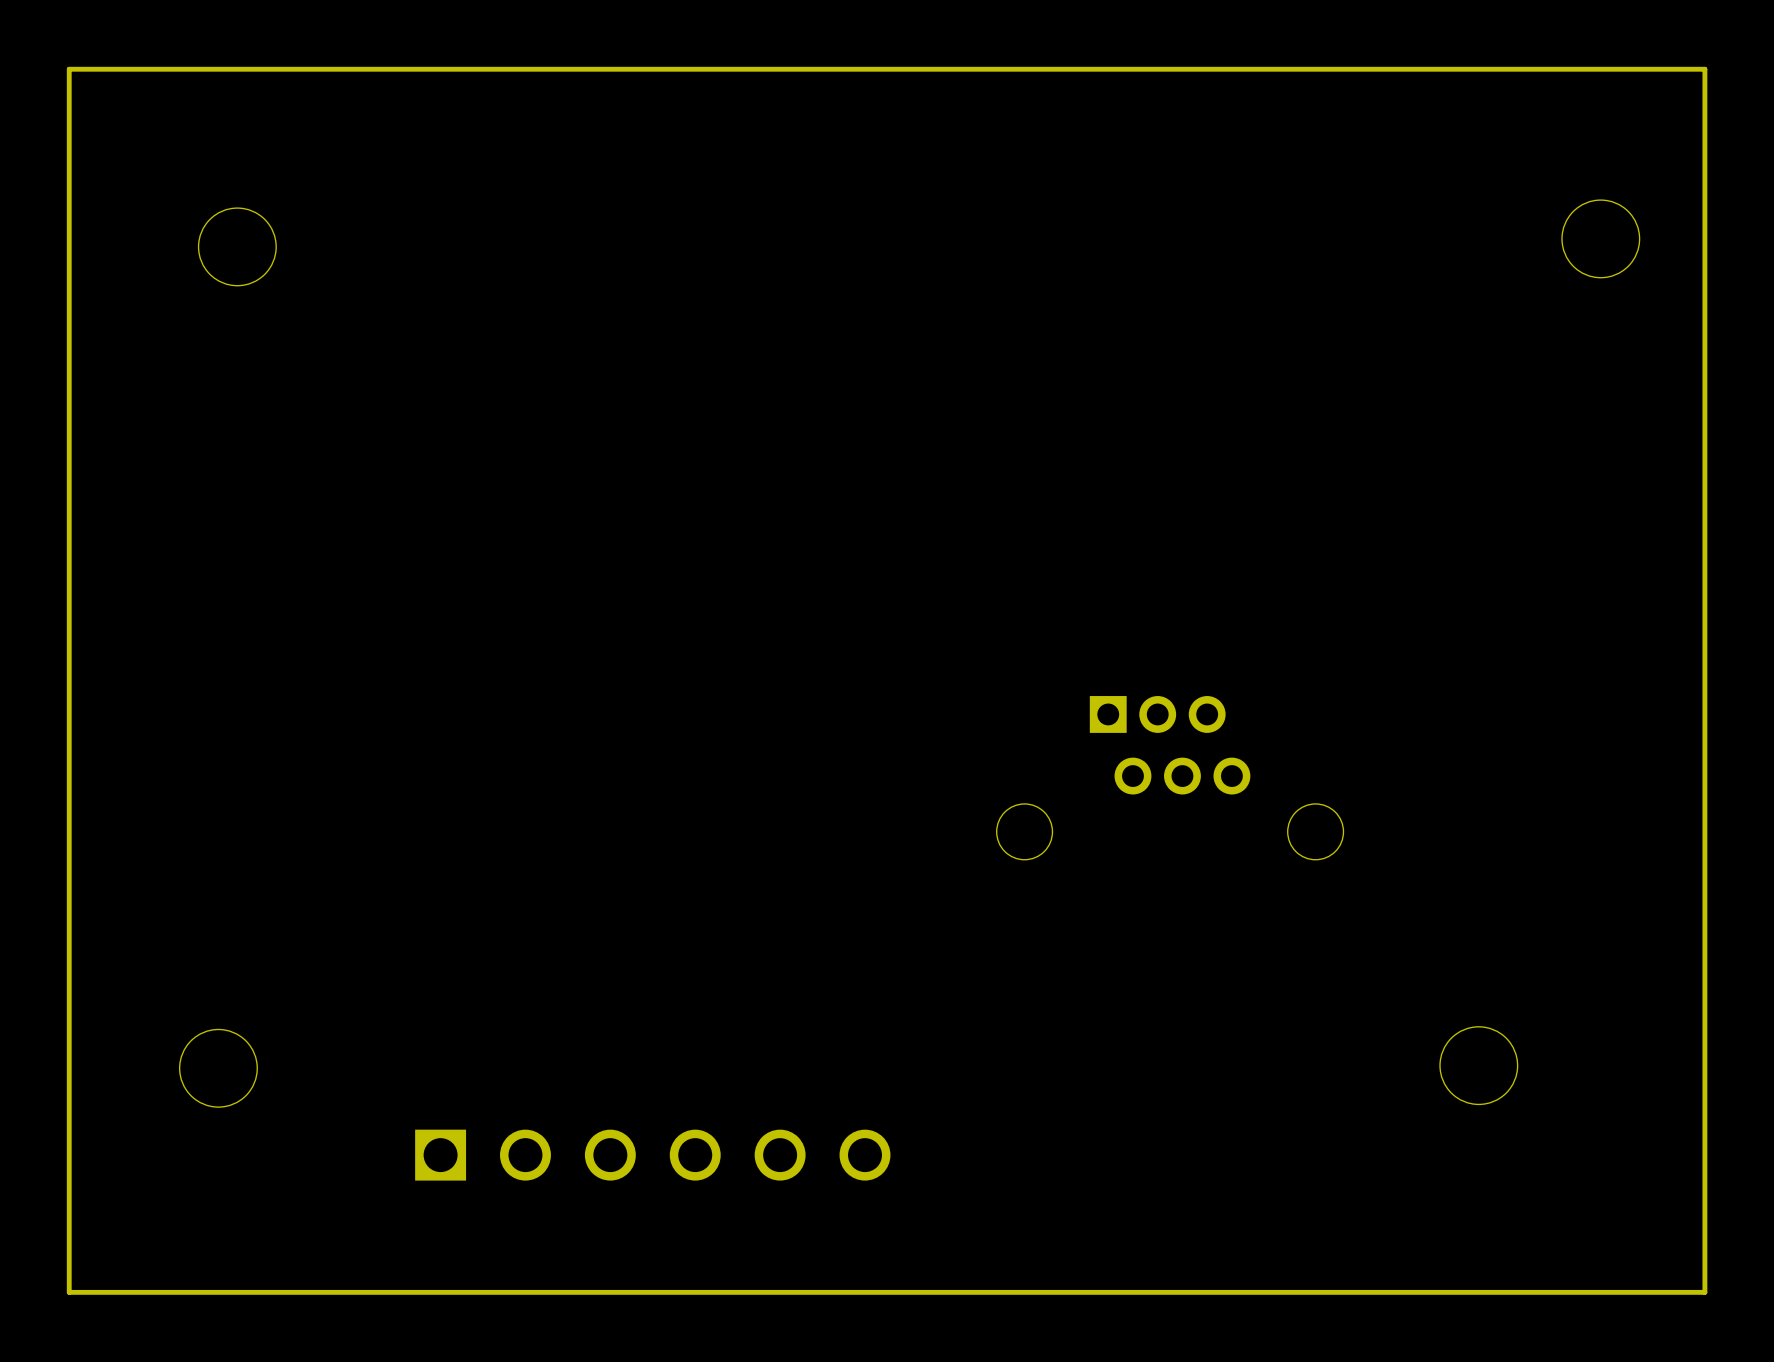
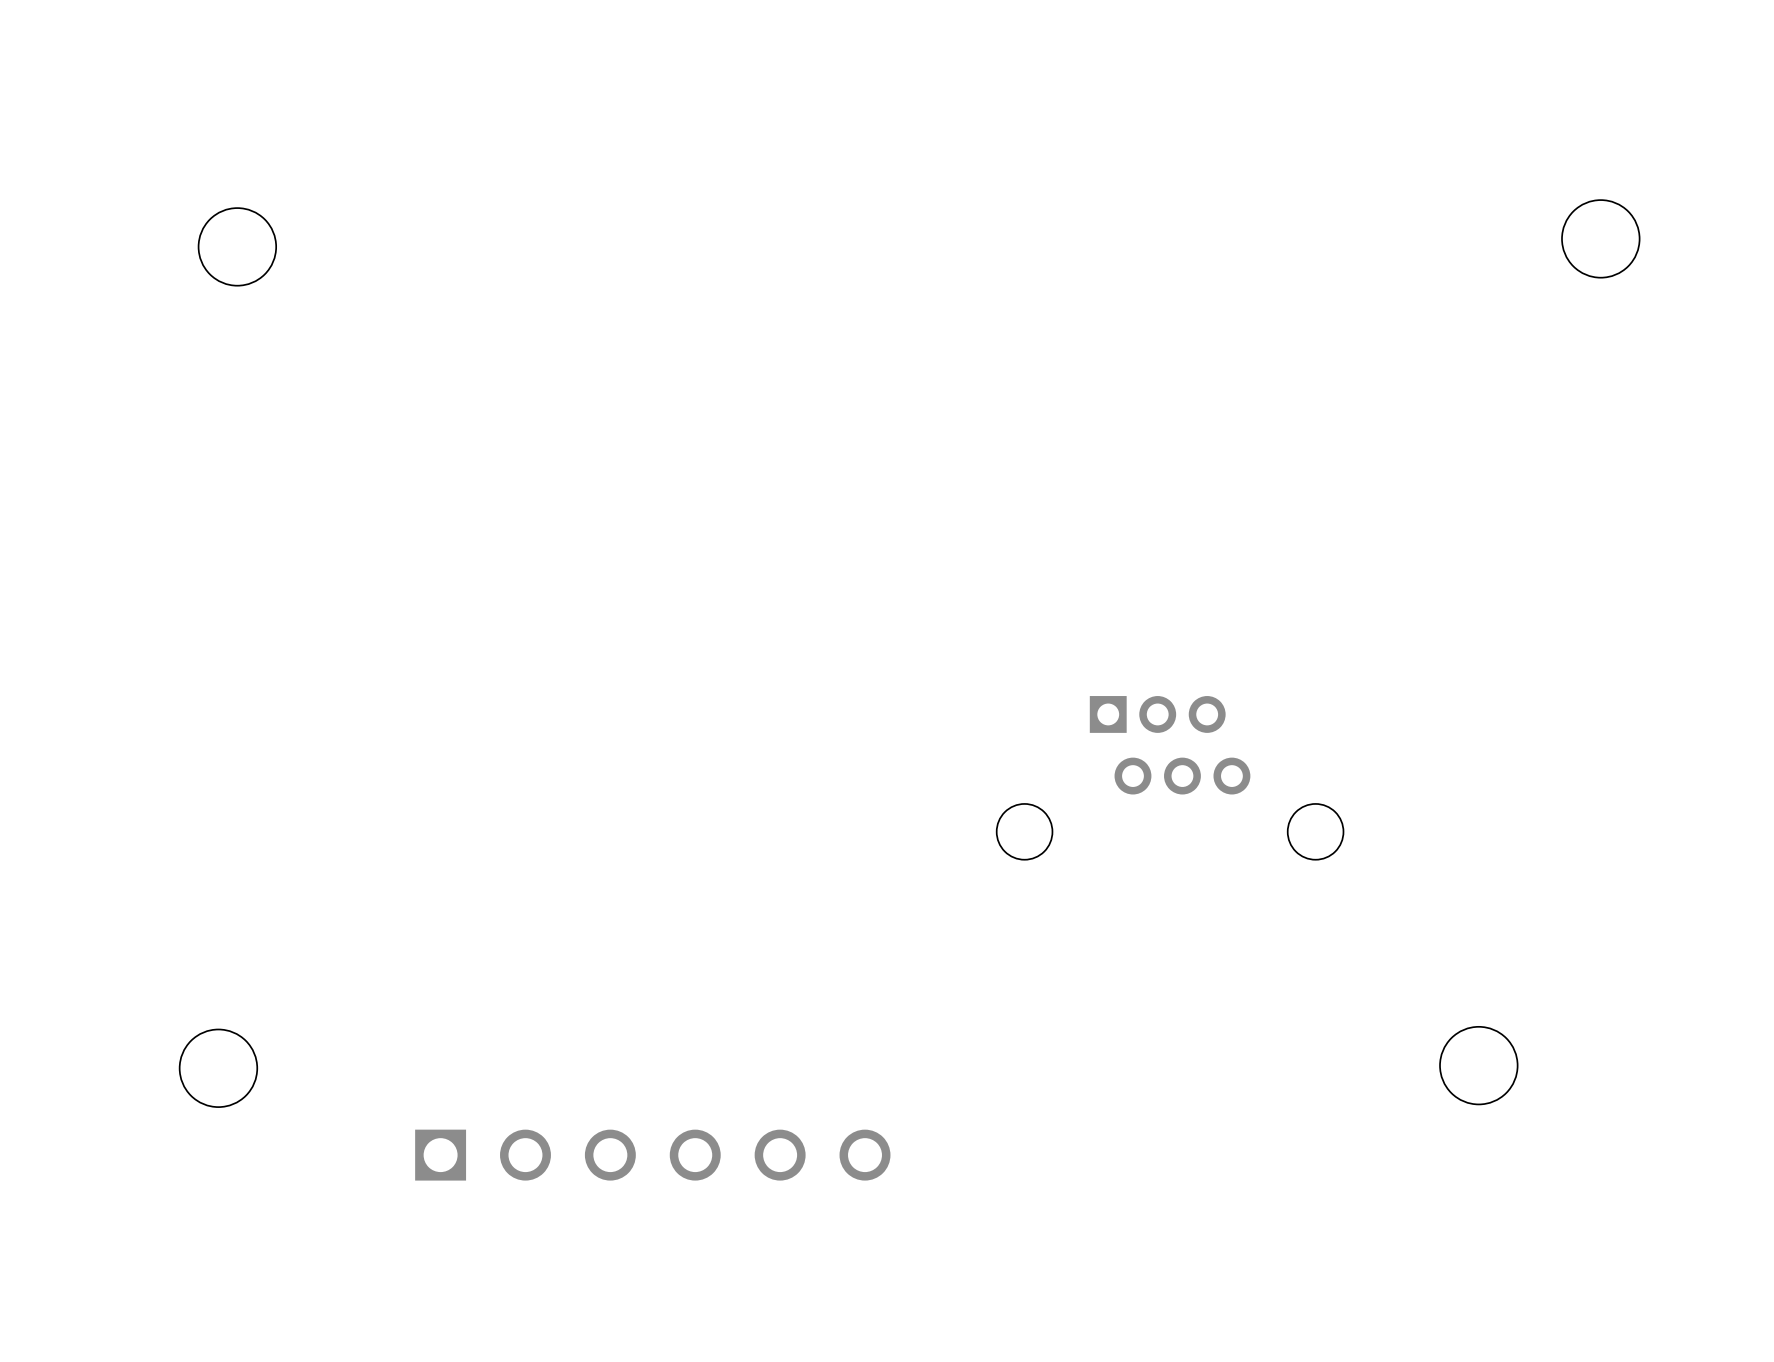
board edge: (1704, 69) (69, 69) (69, 1292) (1704, 1292) (1704, 69) -> none

